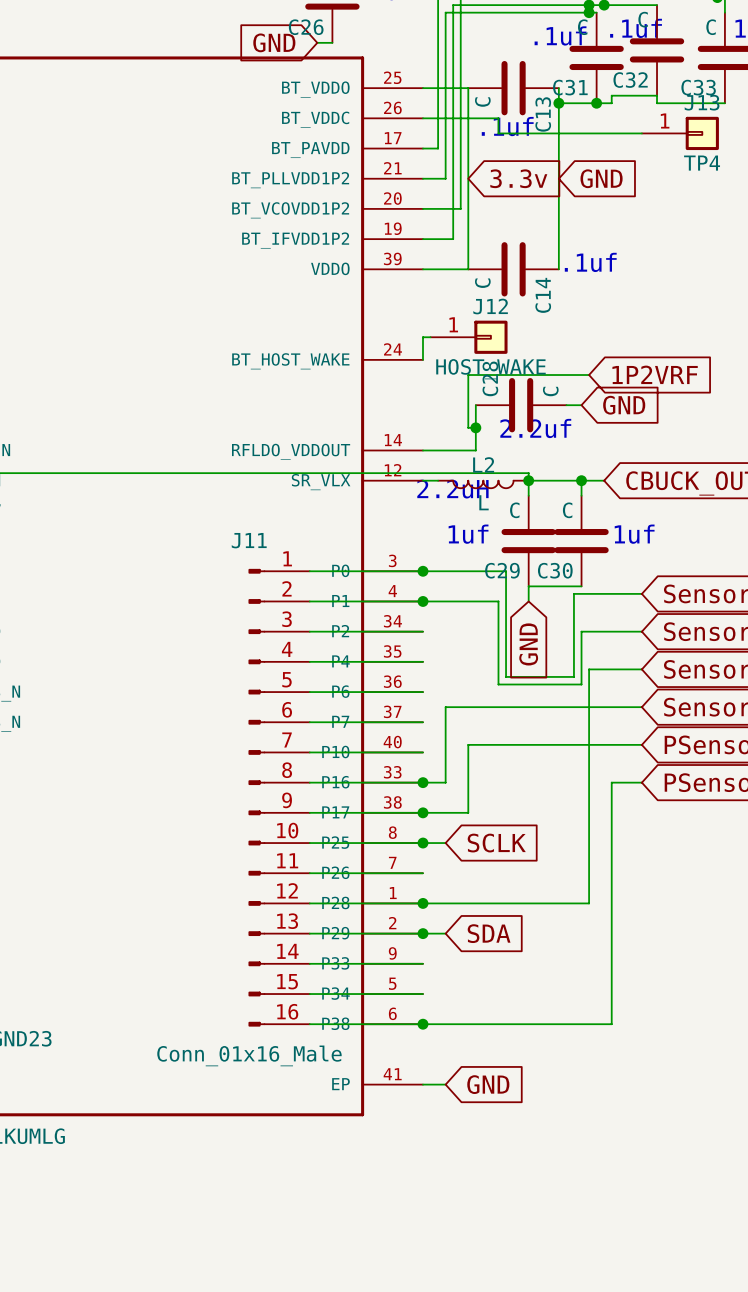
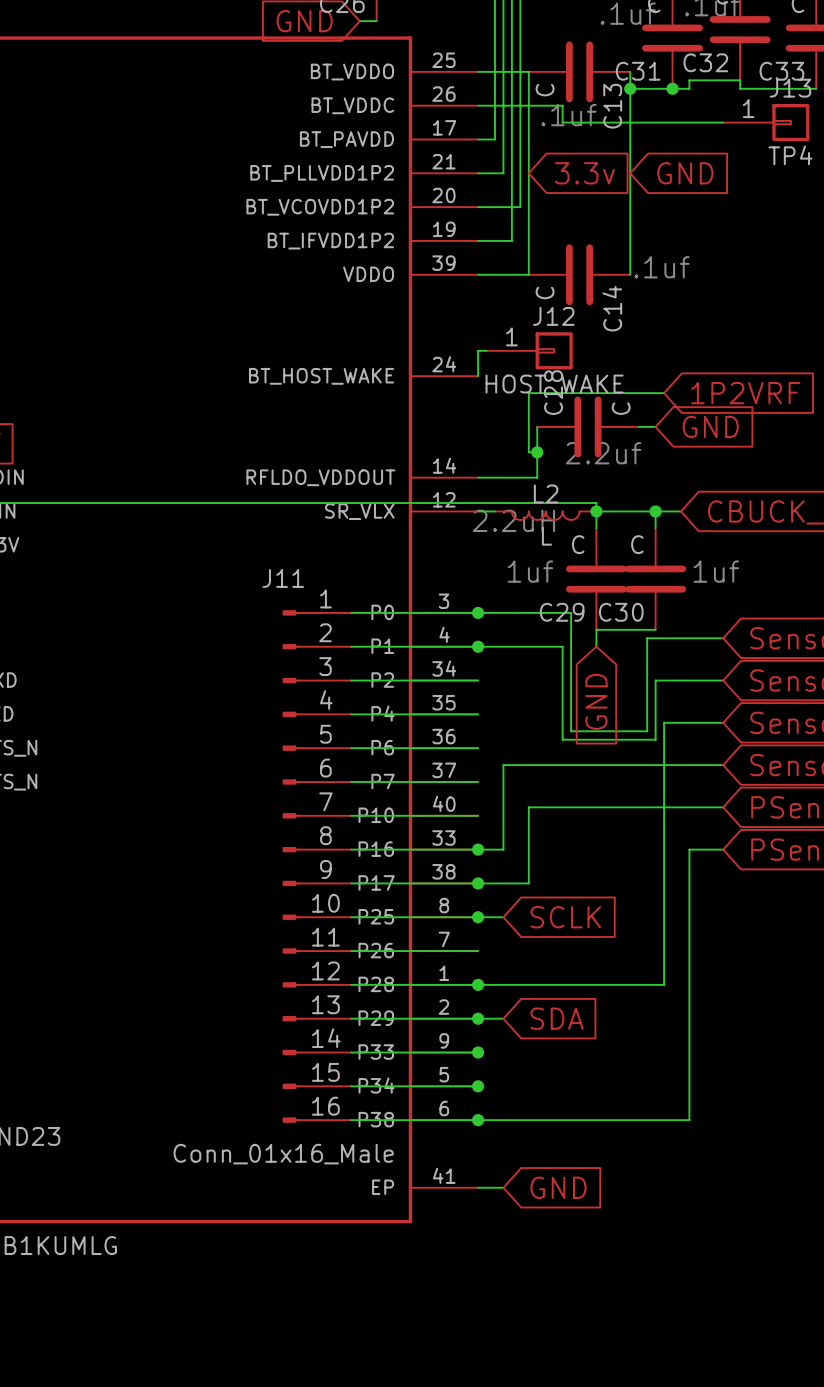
junction: none -> (478, 1052)
junction: none -> (478, 1086)

